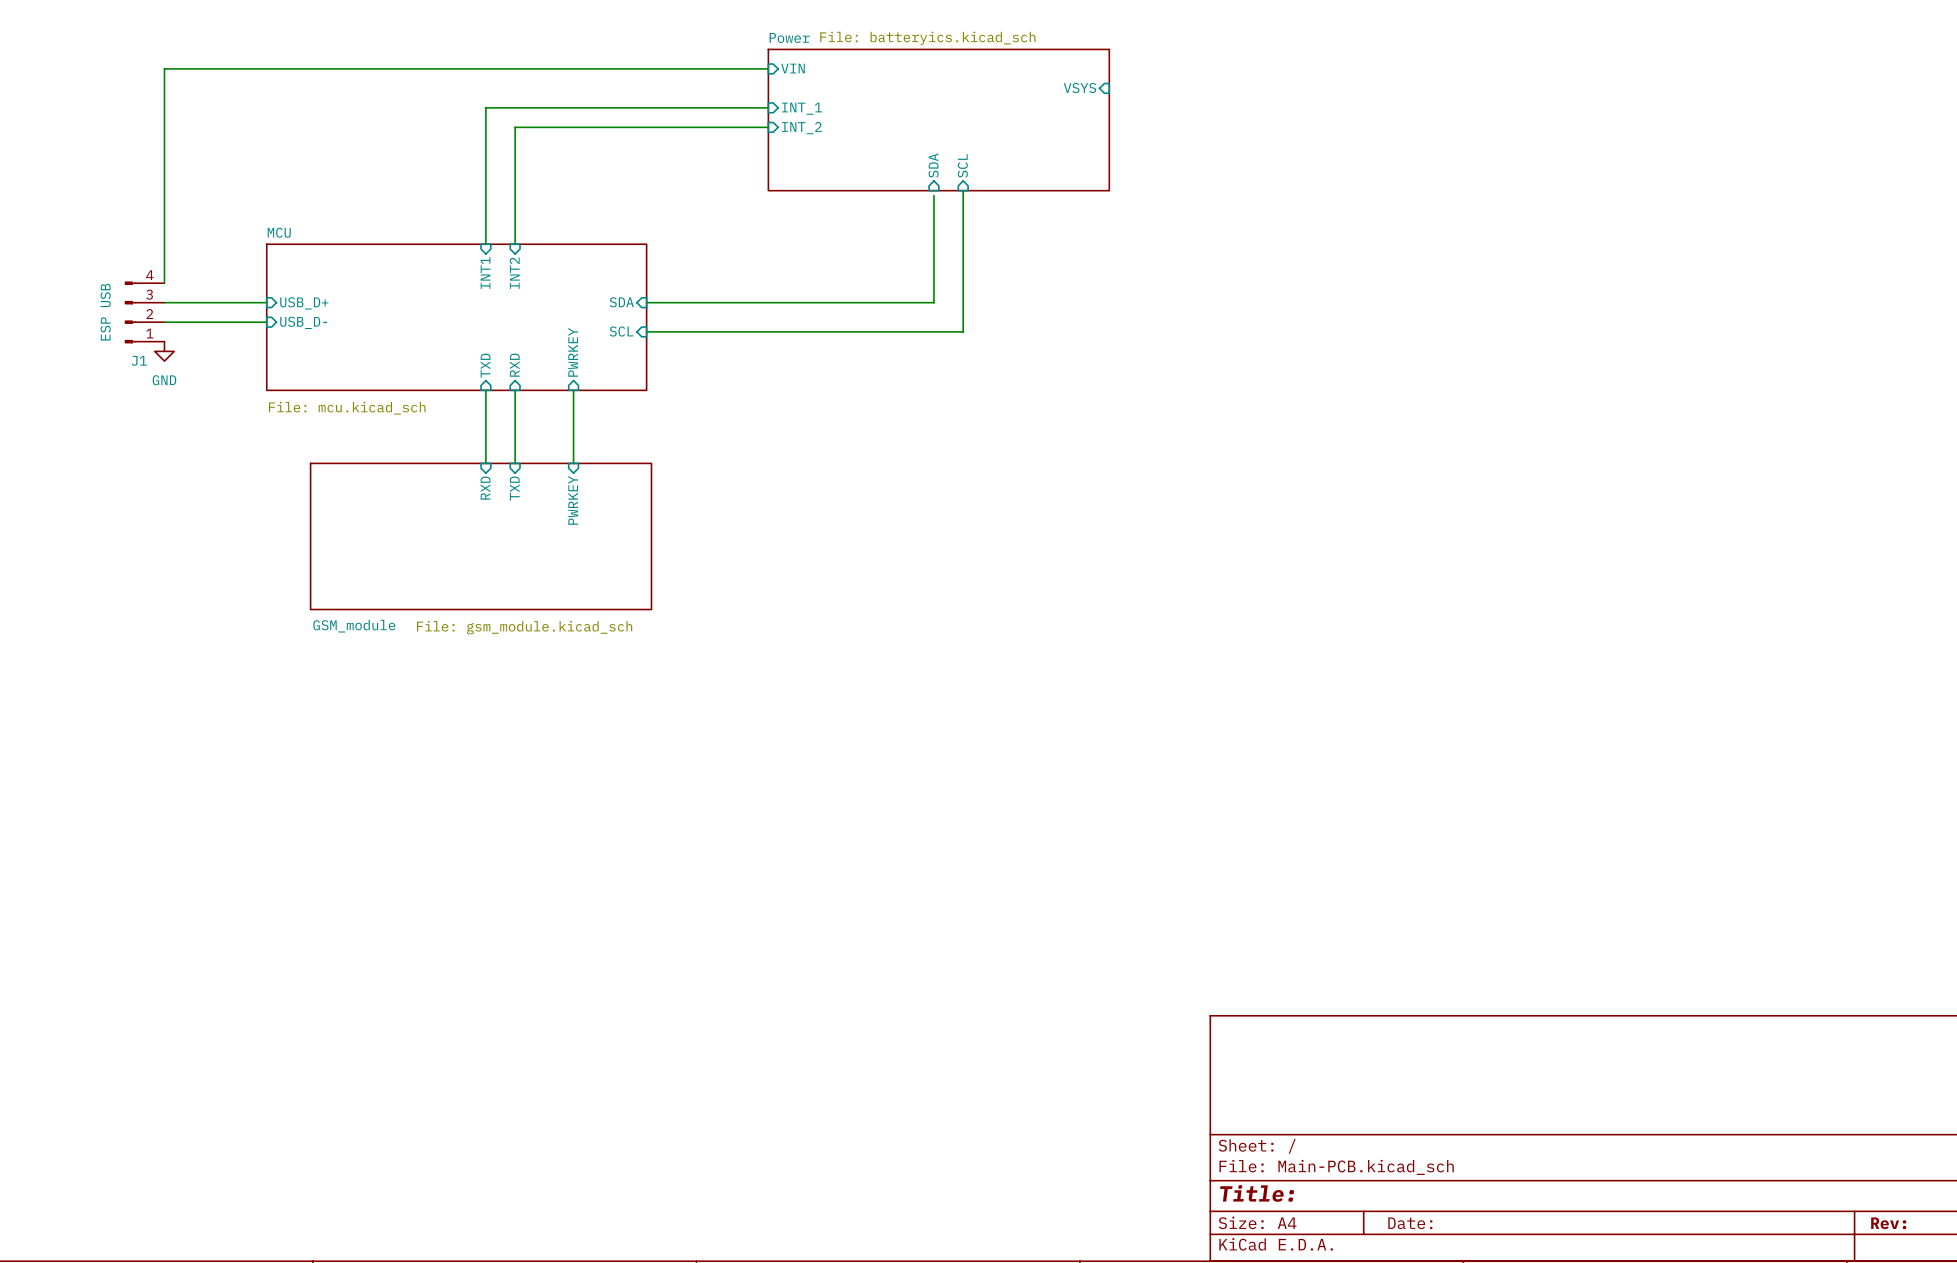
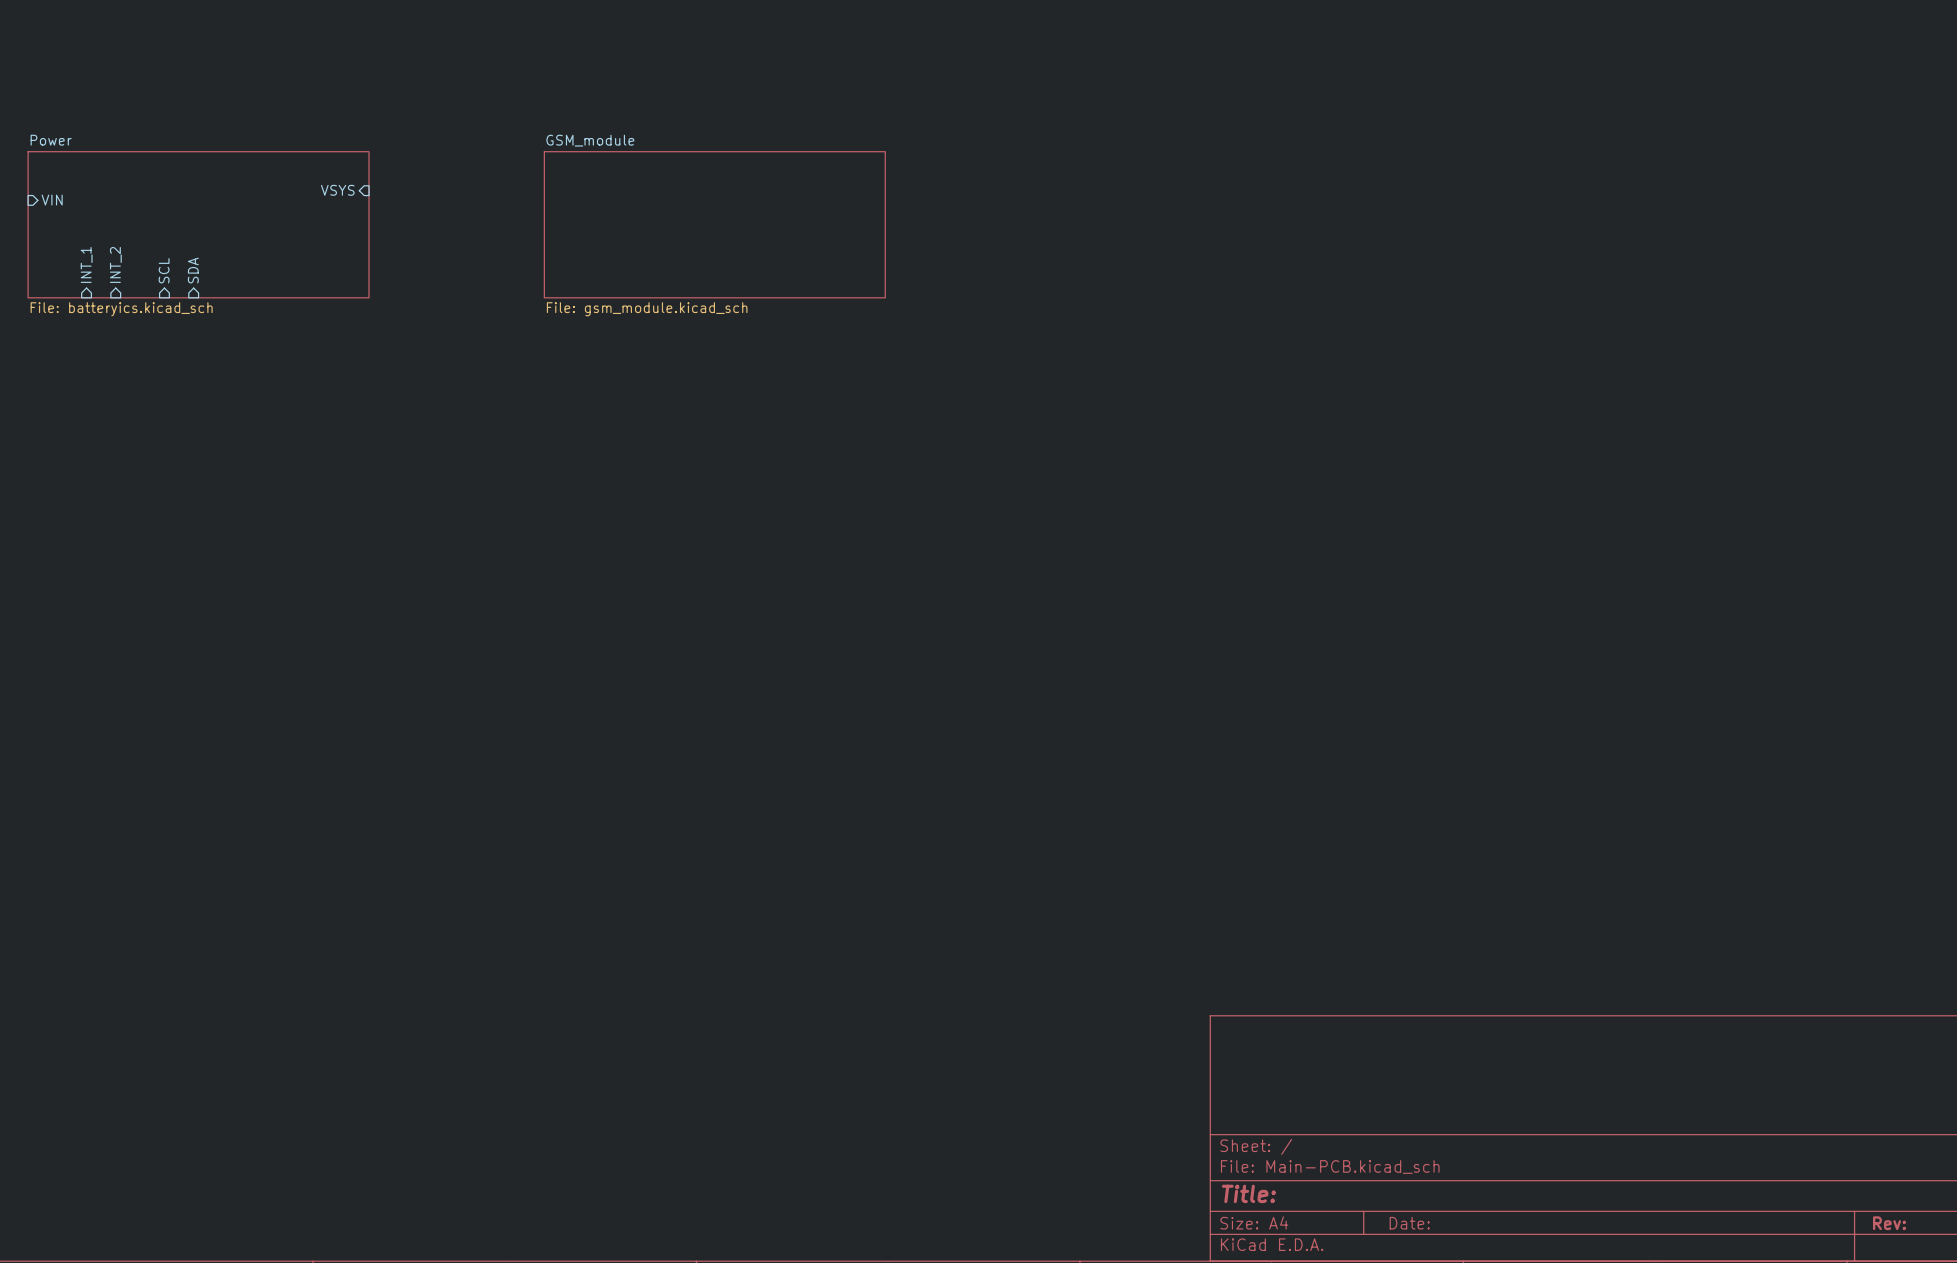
wire: (768, 68) (164, 68) (164, 283) -> none
sheet pin: VIN (793, 68) -> none
sheet pin: VSYS (1080, 88) -> none
wire: (768, 107) (485, 107) (485, 244) -> none
sheet pin: INT_1 (801, 108) -> none
sheet Power: File: batteryics.kicad_sch (938, 120) -> none
wire: (768, 127) (515, 127) (515, 244) -> none
sheet pin: INT_2 (801, 128) -> none
sheet pin: SDA (933, 165) -> none
sheet pin: SCL (962, 165) -> none
sheet pin: none -> VSYS (337, 190)
wire: (963, 190) (963, 331) (646, 331) -> none
wire: (933, 195) (933, 302) (646, 302) -> none
sheet pin: none -> VIN (52, 200)
sheet Power: none -> File: batteryics.kicad_sch (198, 224)
sheet GSM_module: none -> File: gsm_module.kicad_sch (714, 224)
sheet pin: none -> INT_1 (86, 264)
sheet pin: none -> INT_2 (115, 264)
sheet pin: none -> SDA (193, 270)
sheet pin: none -> SCL (164, 270)
sheet pin: INT1 (485, 273) -> none
sheet pin: INT2 (514, 273) -> none
wire: (164, 302) (266, 302) -> none
sheet pin: SDA (621, 302) -> none
sheet pin: USB_D+ (304, 303) -> none
J1: ESP USB (144, 312) -> none
sheet MCU: File: mcu.kicad_sch (456, 317) -> none
wire: (164, 322) (266, 322) -> none
sheet pin: USB_D- (303, 322) -> none
sheet pin: SCL (621, 331) -> none
power symbol: GND (164, 351) -> none
sheet pin: PWRKEY (573, 352) -> none
sheet pin: TXD (485, 365) -> none
sheet pin: RXD (514, 365) -> none
wire: (485, 390) (485, 463) -> none
wire: (515, 390) (515, 463) -> none
wire: (573, 390) (573, 463) -> none
sheet pin: RXD (485, 488) -> none
sheet pin: TXD (514, 488) -> none
sheet pin: PWRKEY (573, 500) -> none
sheet GSM_module: File: gsm_module.kicad_sch (481, 536) -> none

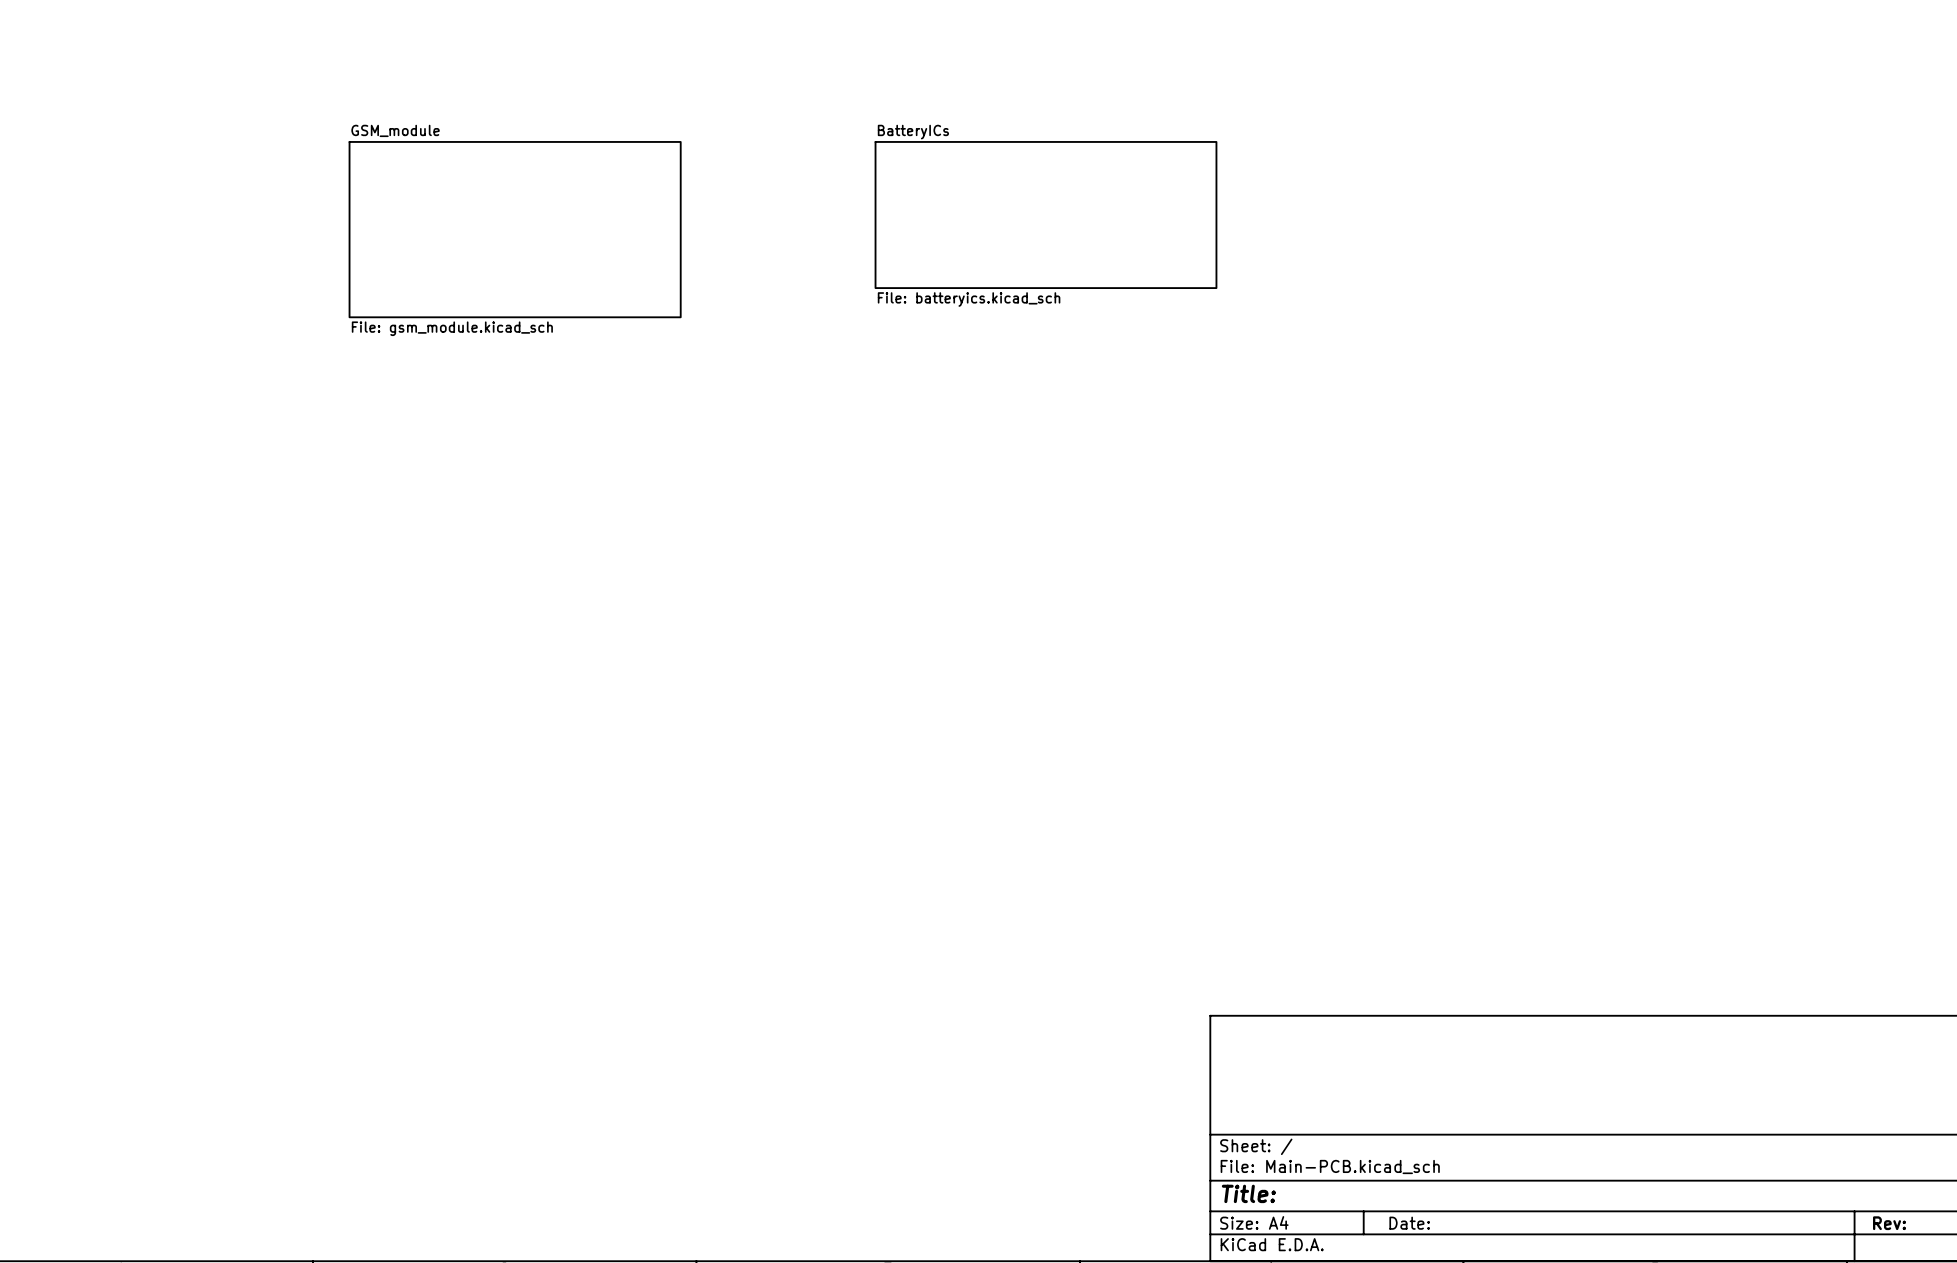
sheet pin: VSYS (337, 190) -> none
sheet pin: VIN (52, 200) -> none
sheet BatteryICs: none -> File: batteryics.kicad_sch (1045, 215)
sheet Power: File: batteryics.kicad_sch (198, 224) -> none
sheet GSM_module: File: gsm_module.kicad_sch (714, 224) -> none
sheet GSM_module: none -> File: gsm_module.kicad_sch (515, 229)
sheet pin: INT_1 (86, 264) -> none
sheet pin: INT_2 (115, 264) -> none
sheet pin: SCL (164, 270) -> none
sheet pin: SDA (193, 270) -> none

